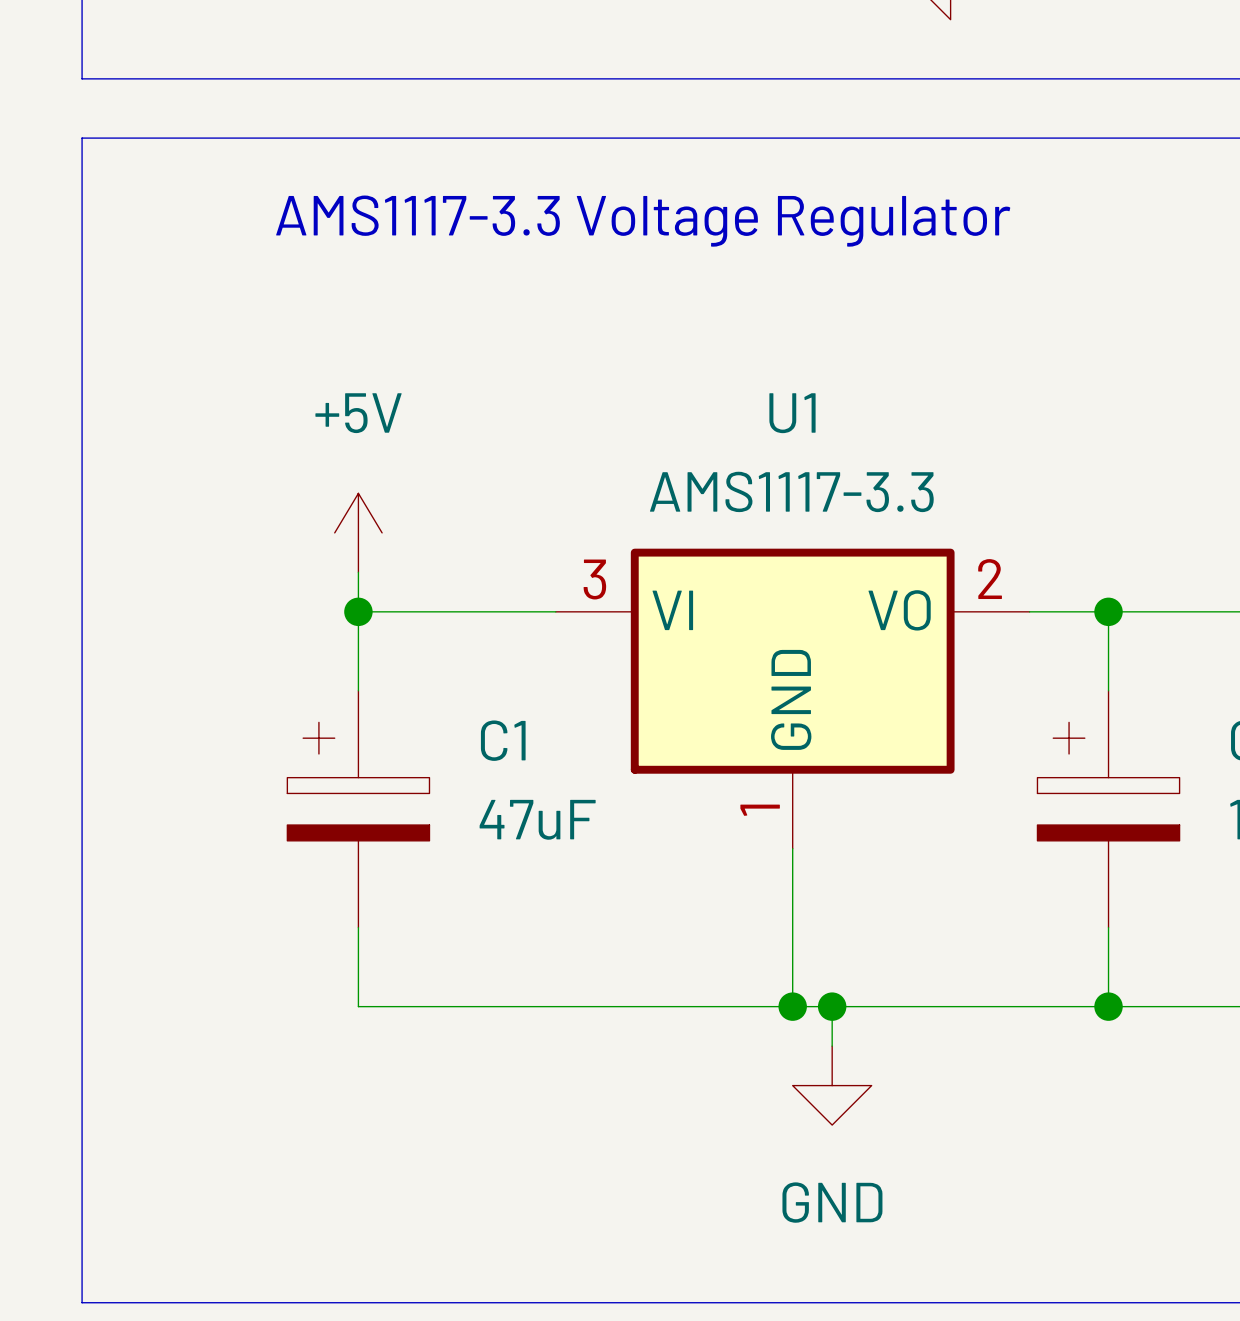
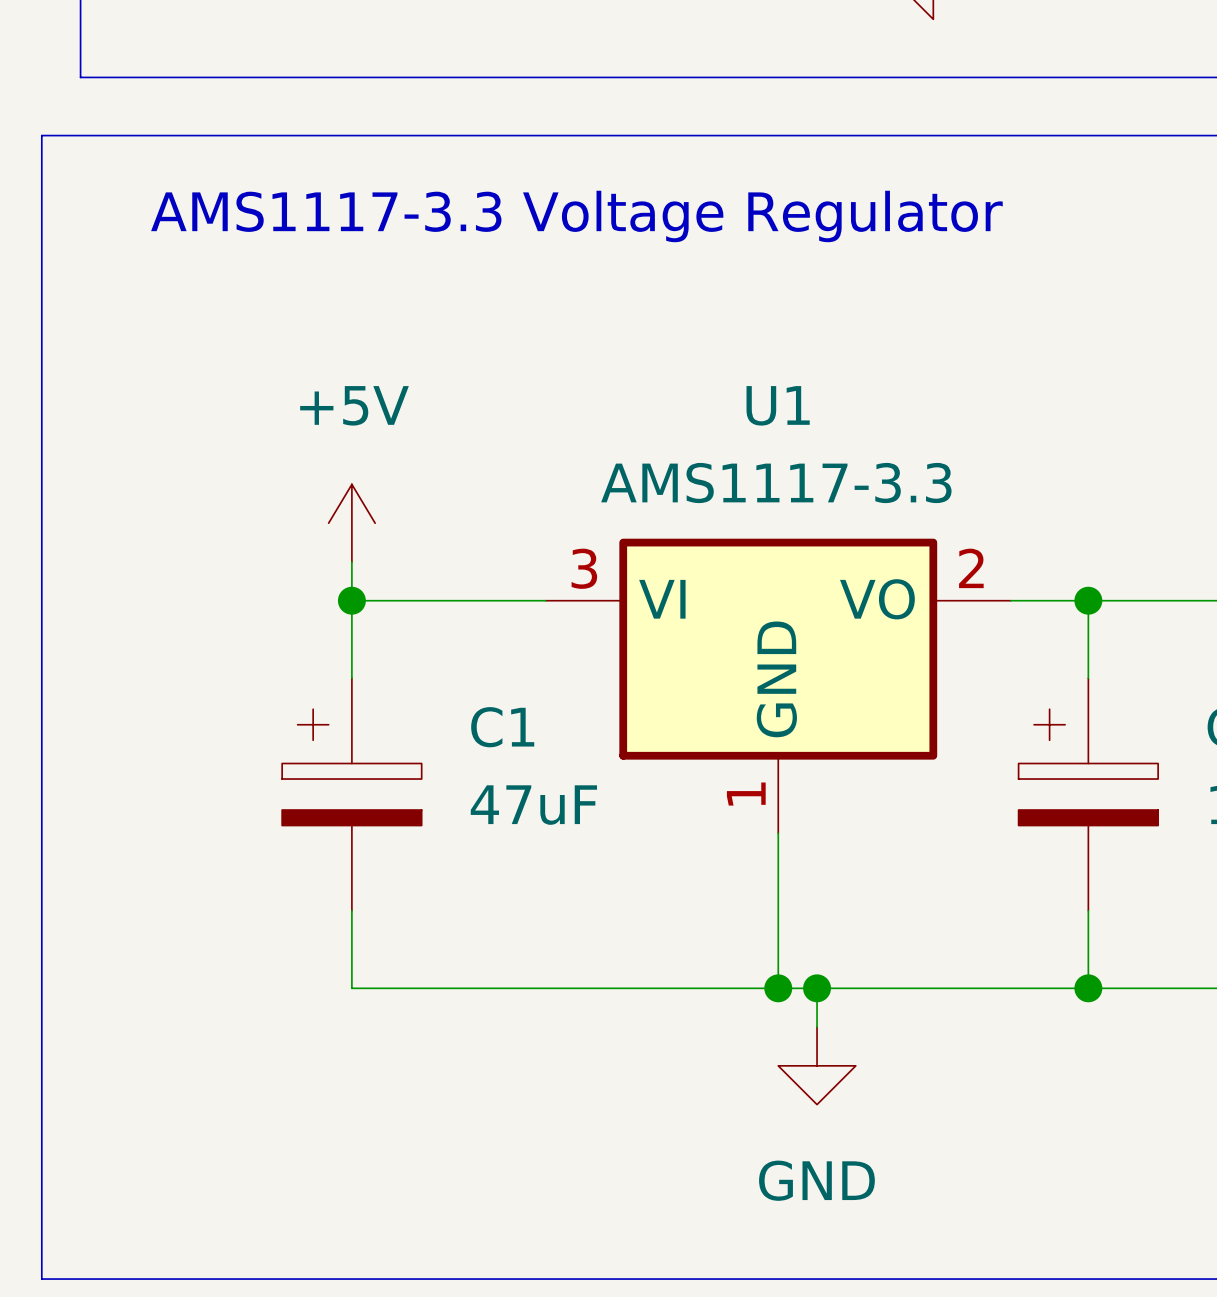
line: (82, 138) (82, 1302) -> (80, 135) (41, 135) (41, 1279) (80, 1279)
text position: AMS1117-3.3 Voltage Regulator (643, 221) -> AMS1117-3.3 Voltage Regulator (576, 216)

